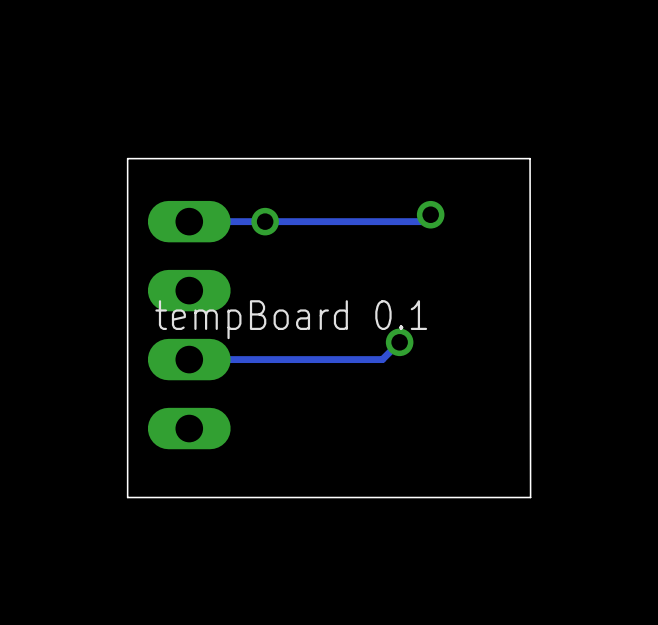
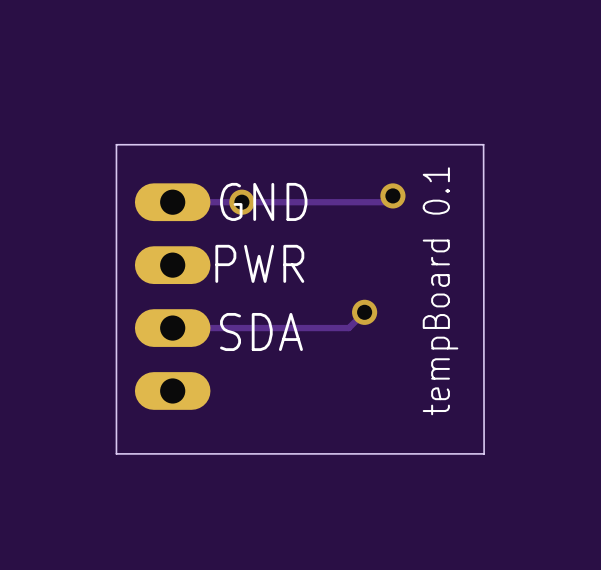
text: none -> GND (263, 201)
text: none -> PWR (259, 263)
text rotation: 0° (291, 319) -> 90° counterclockwise (440, 291)
text: none -> SDA (261, 331)

